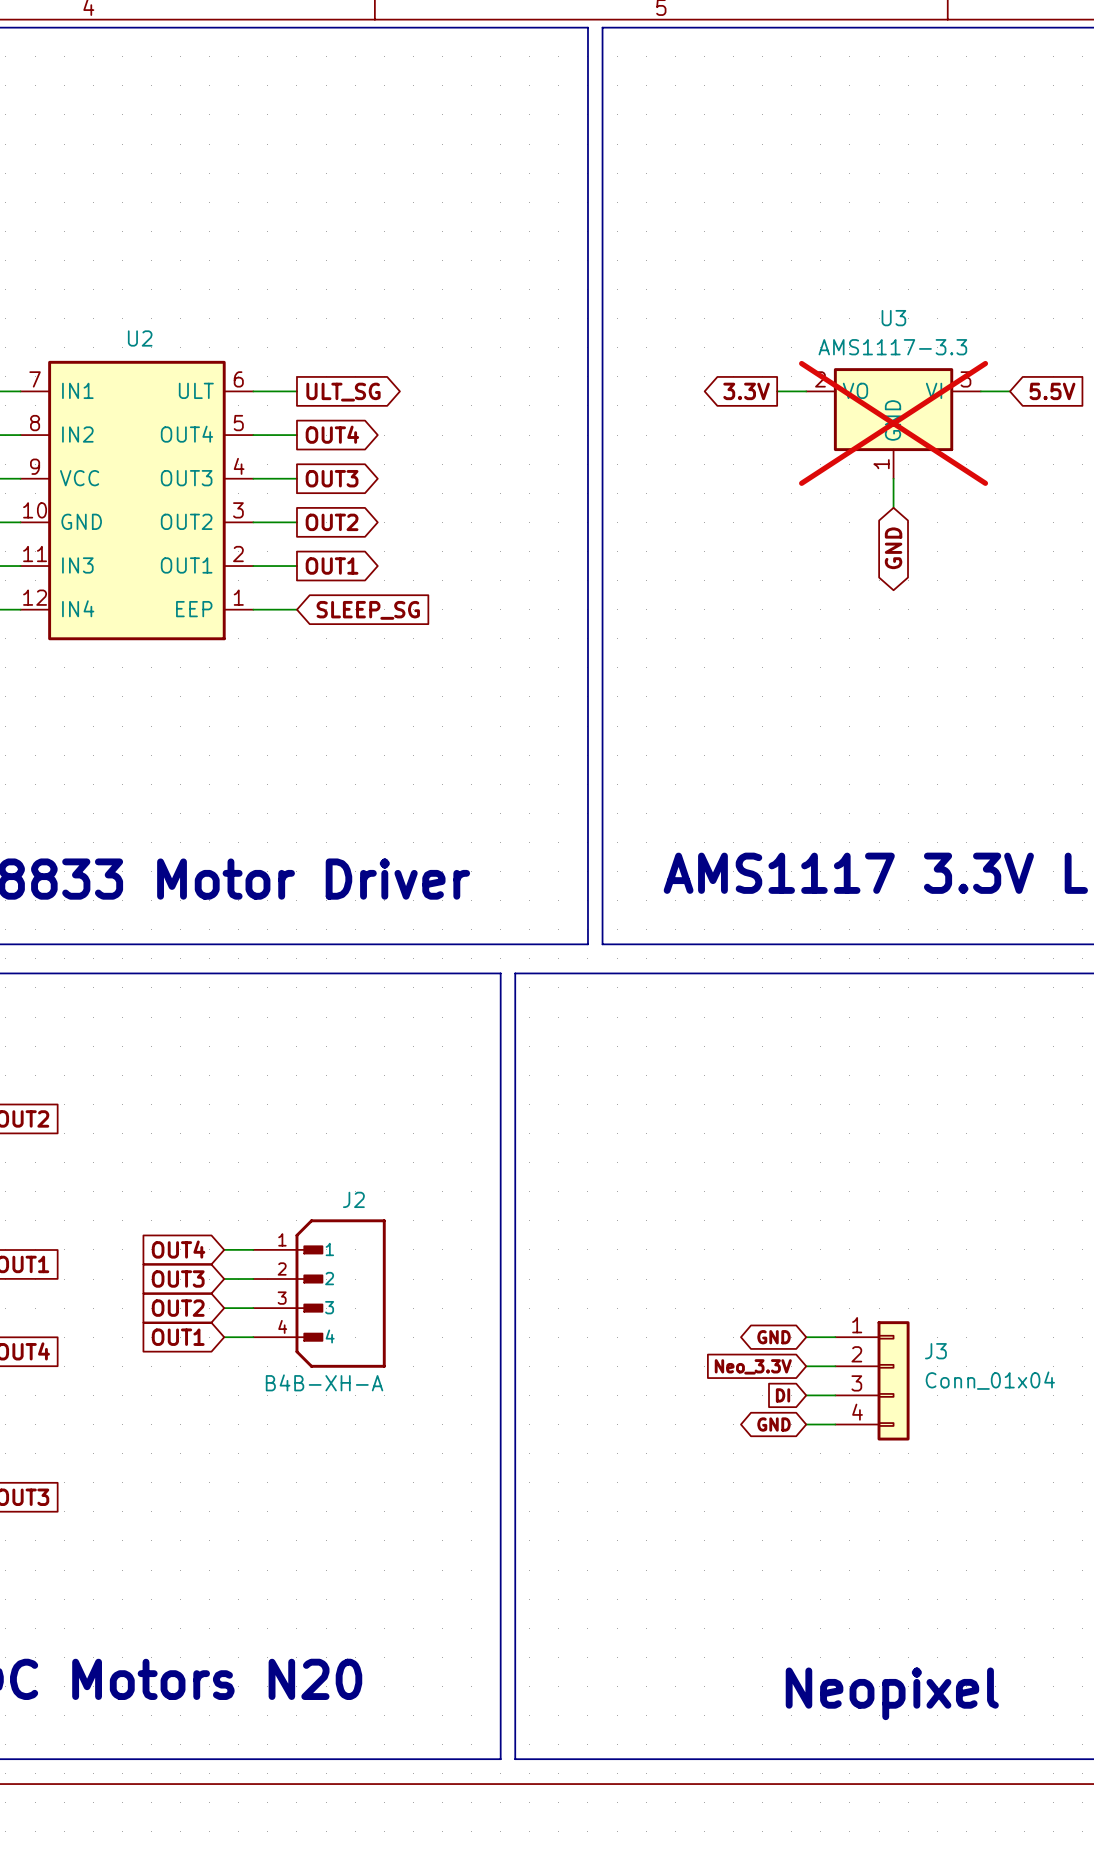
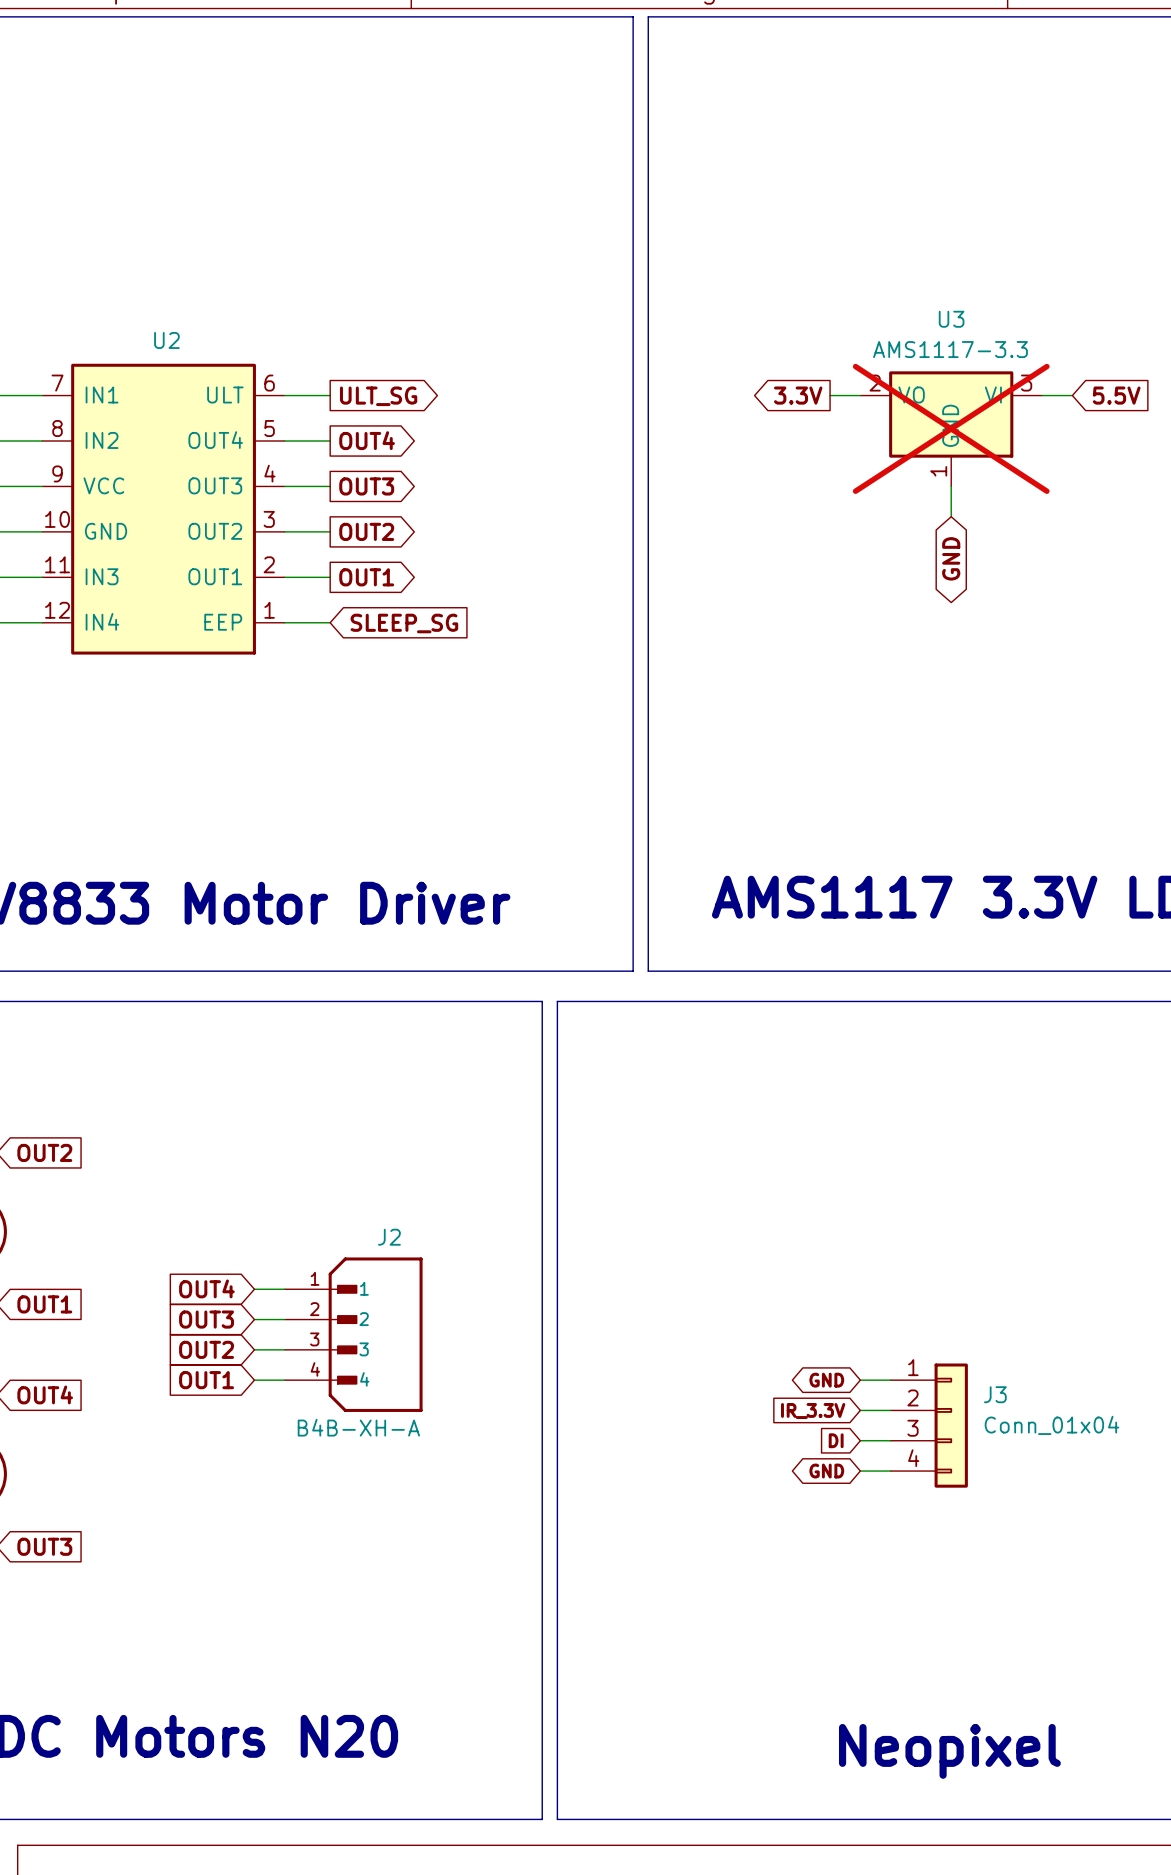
global label: Neo_3.3V (753, 1366) -> IR_3.3V (813, 1411)

